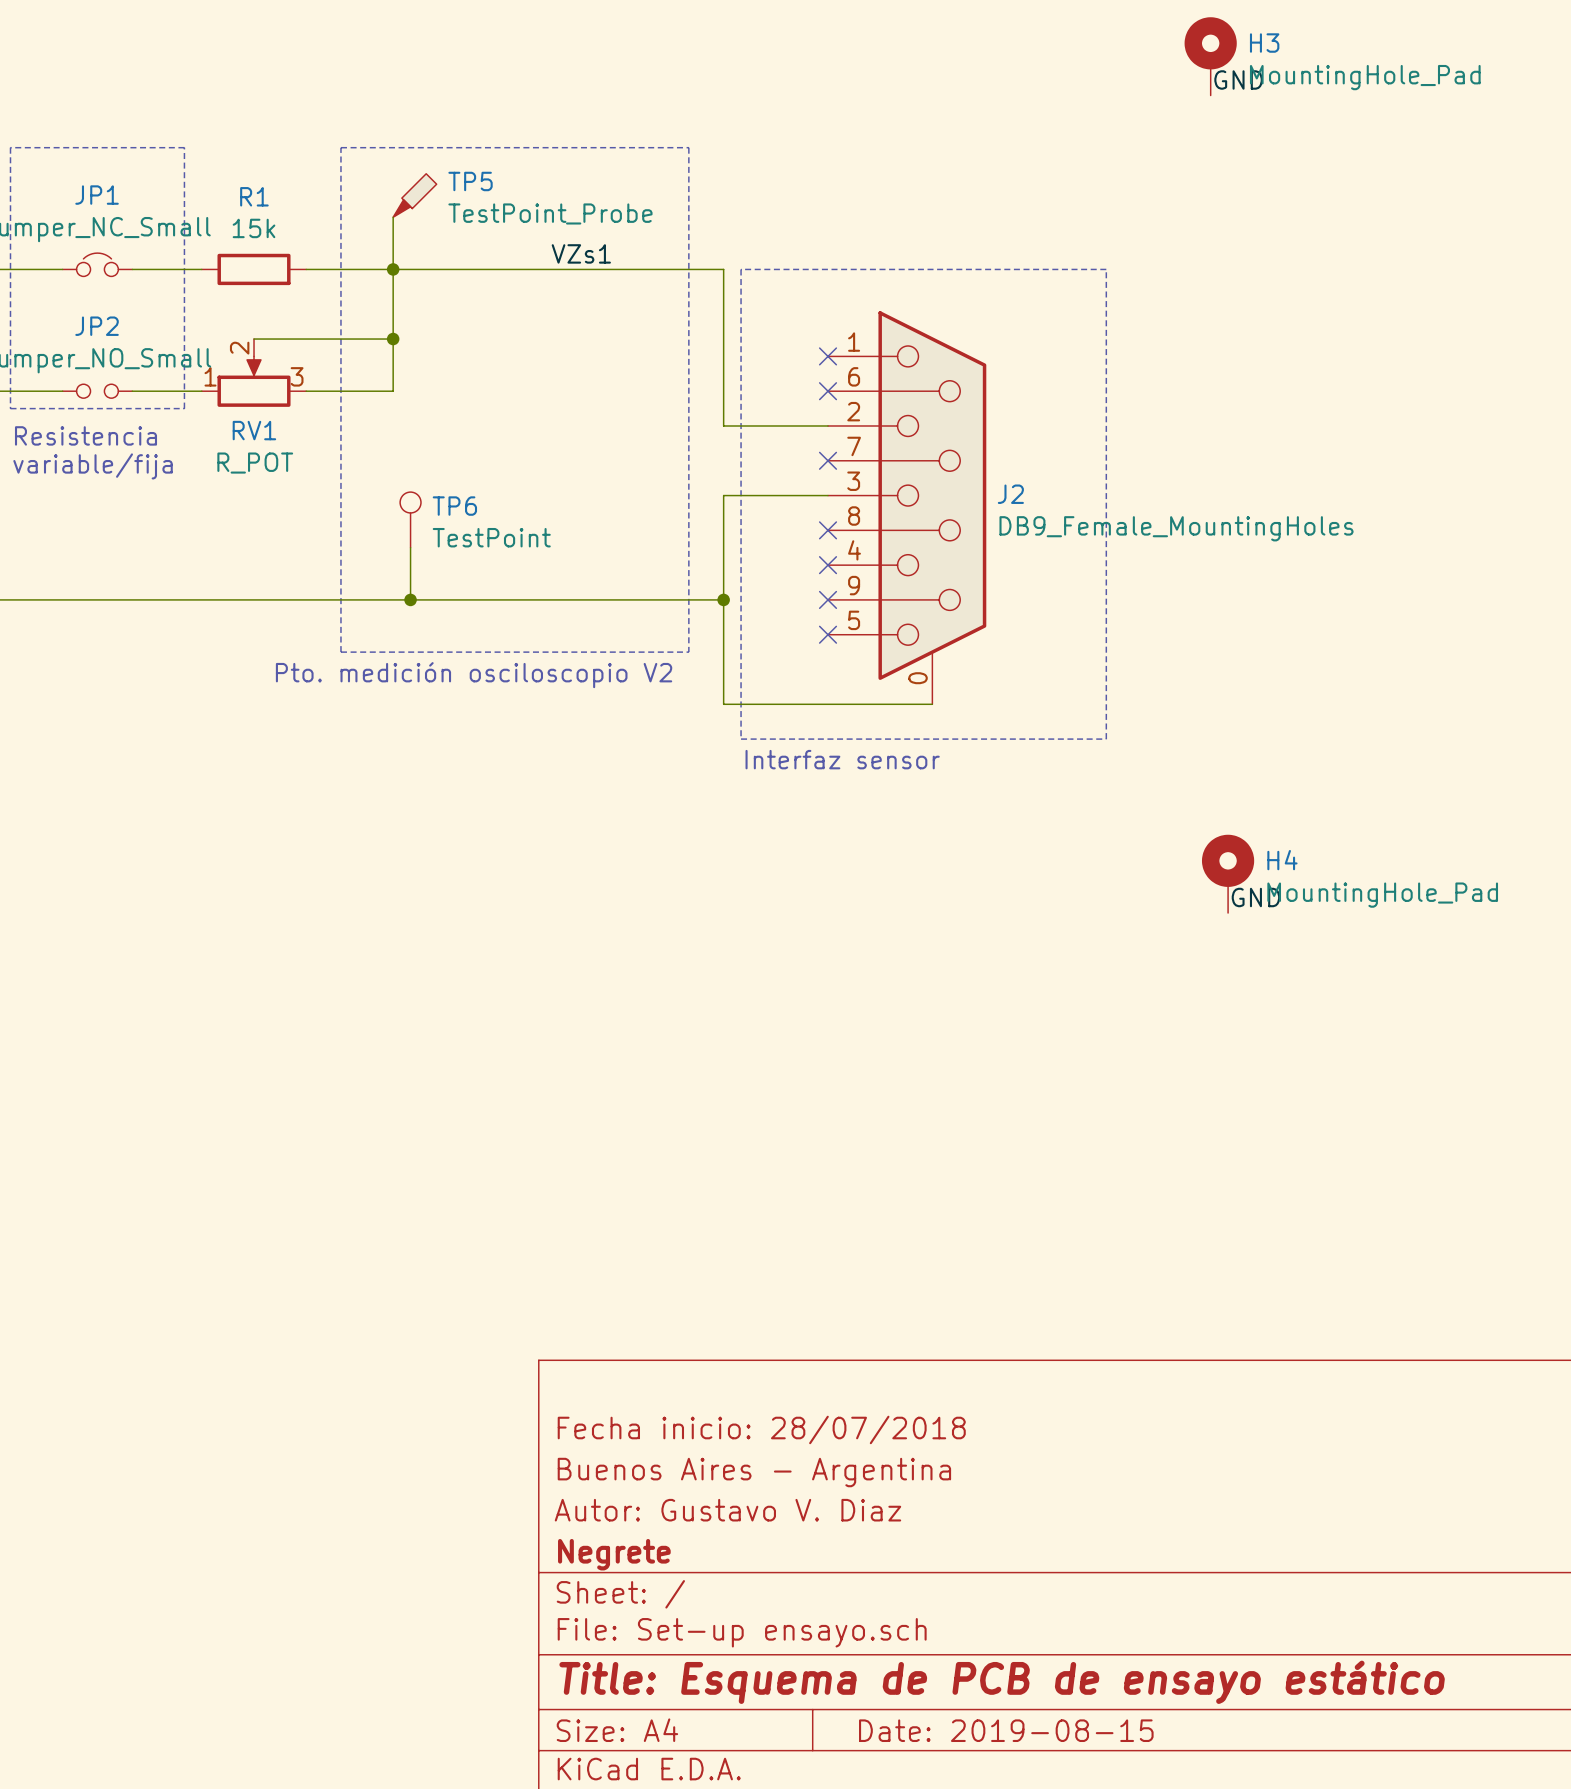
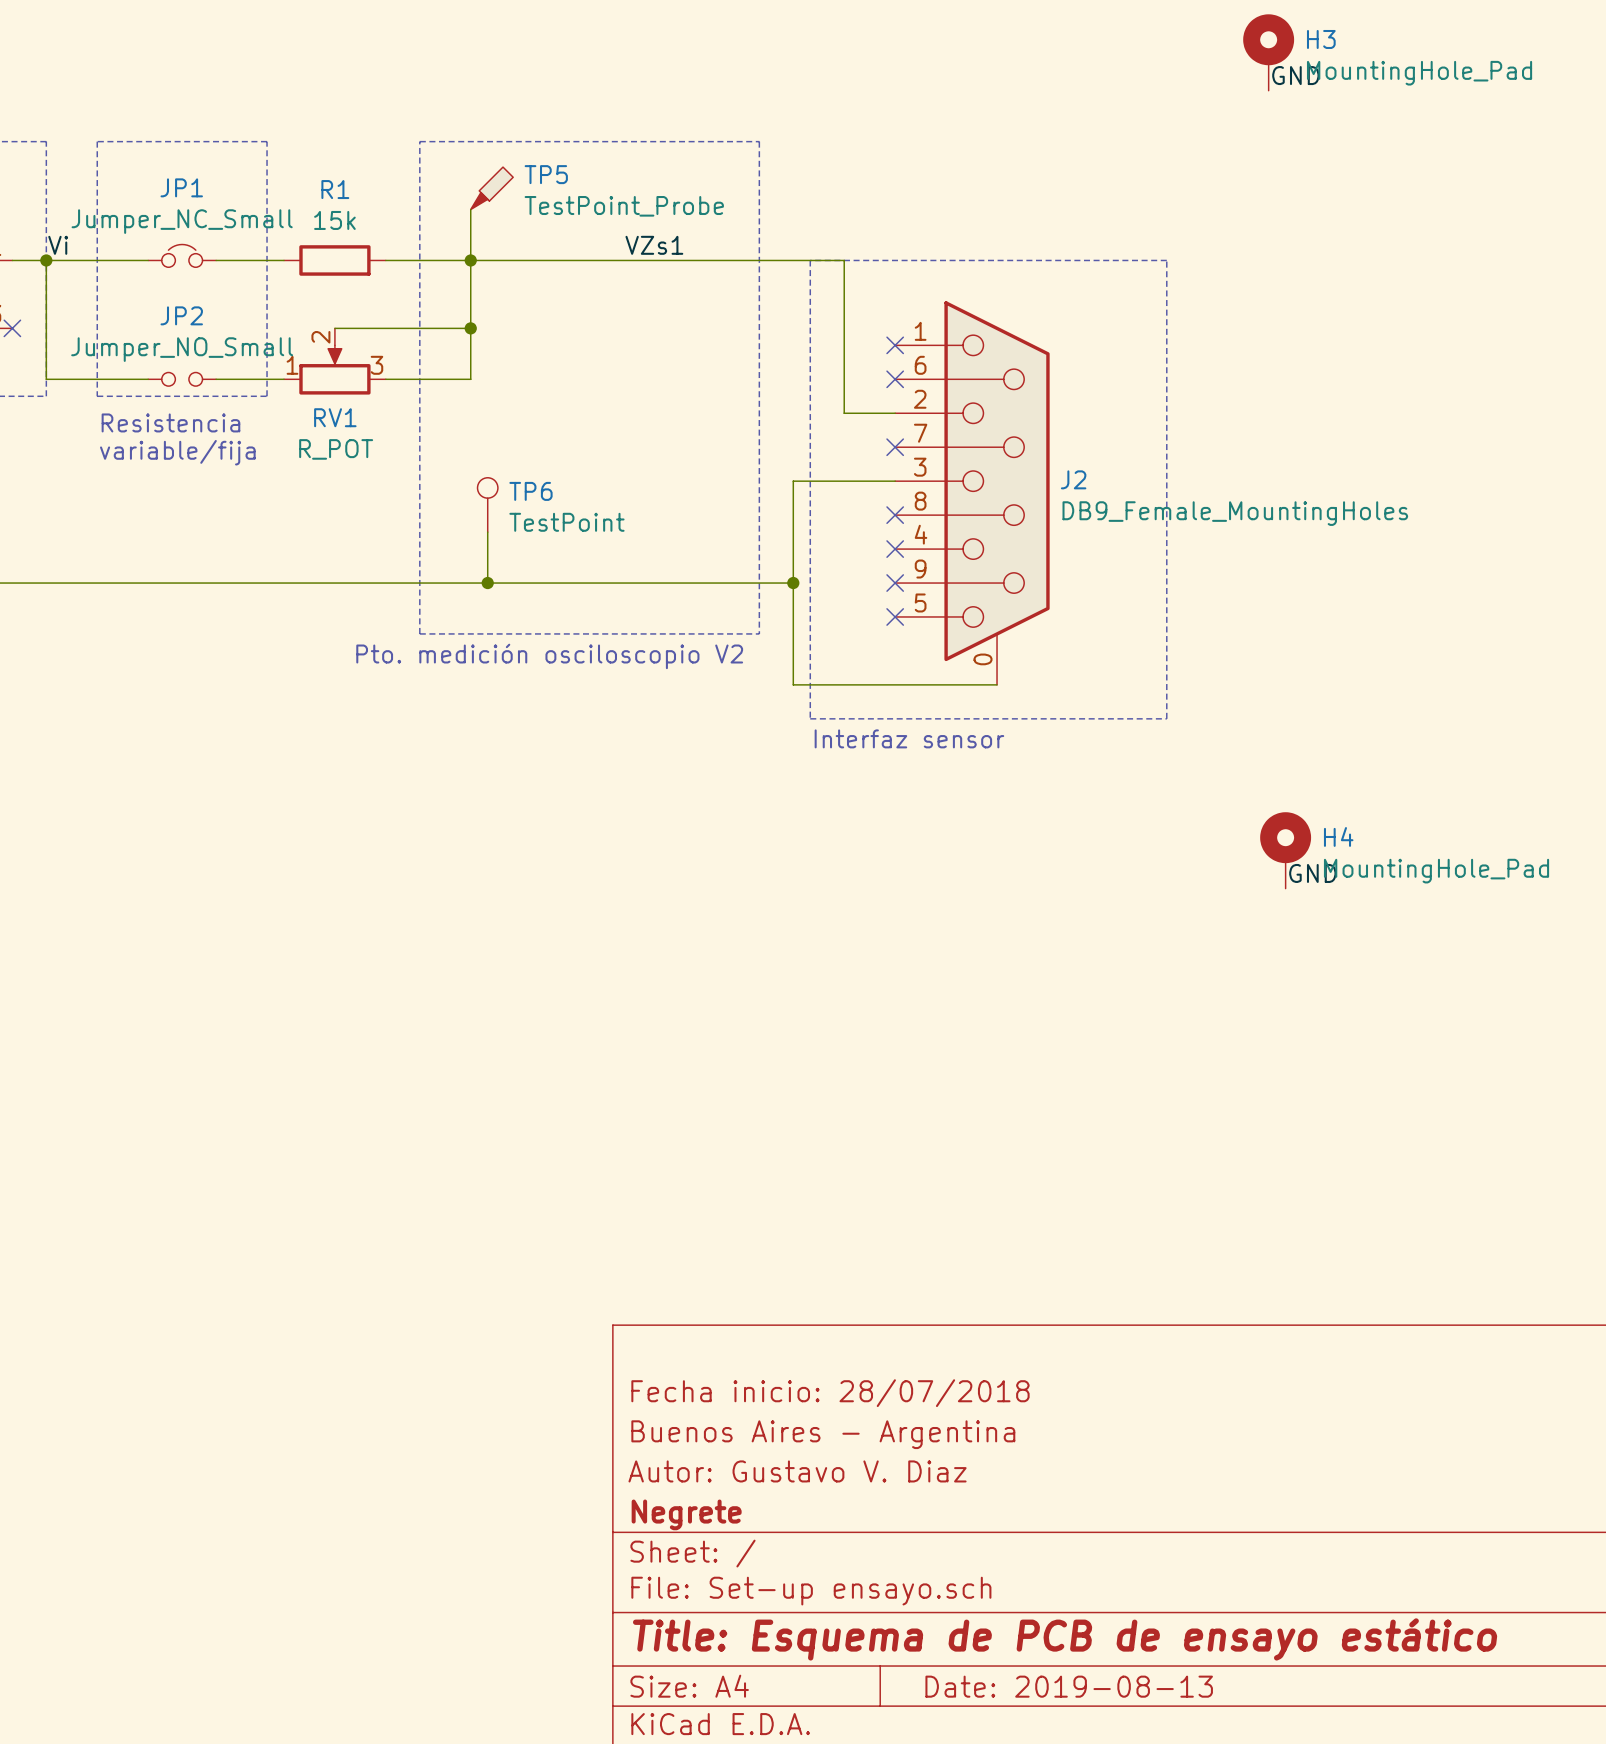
wire: (723, 269) (723, 425) (775, 425) -> (793, 260) (844, 260) (844, 413)
title block: Date: 2019-08-15 (1006, 1730) -> Date: 2019-08-13 (1069, 1686)

